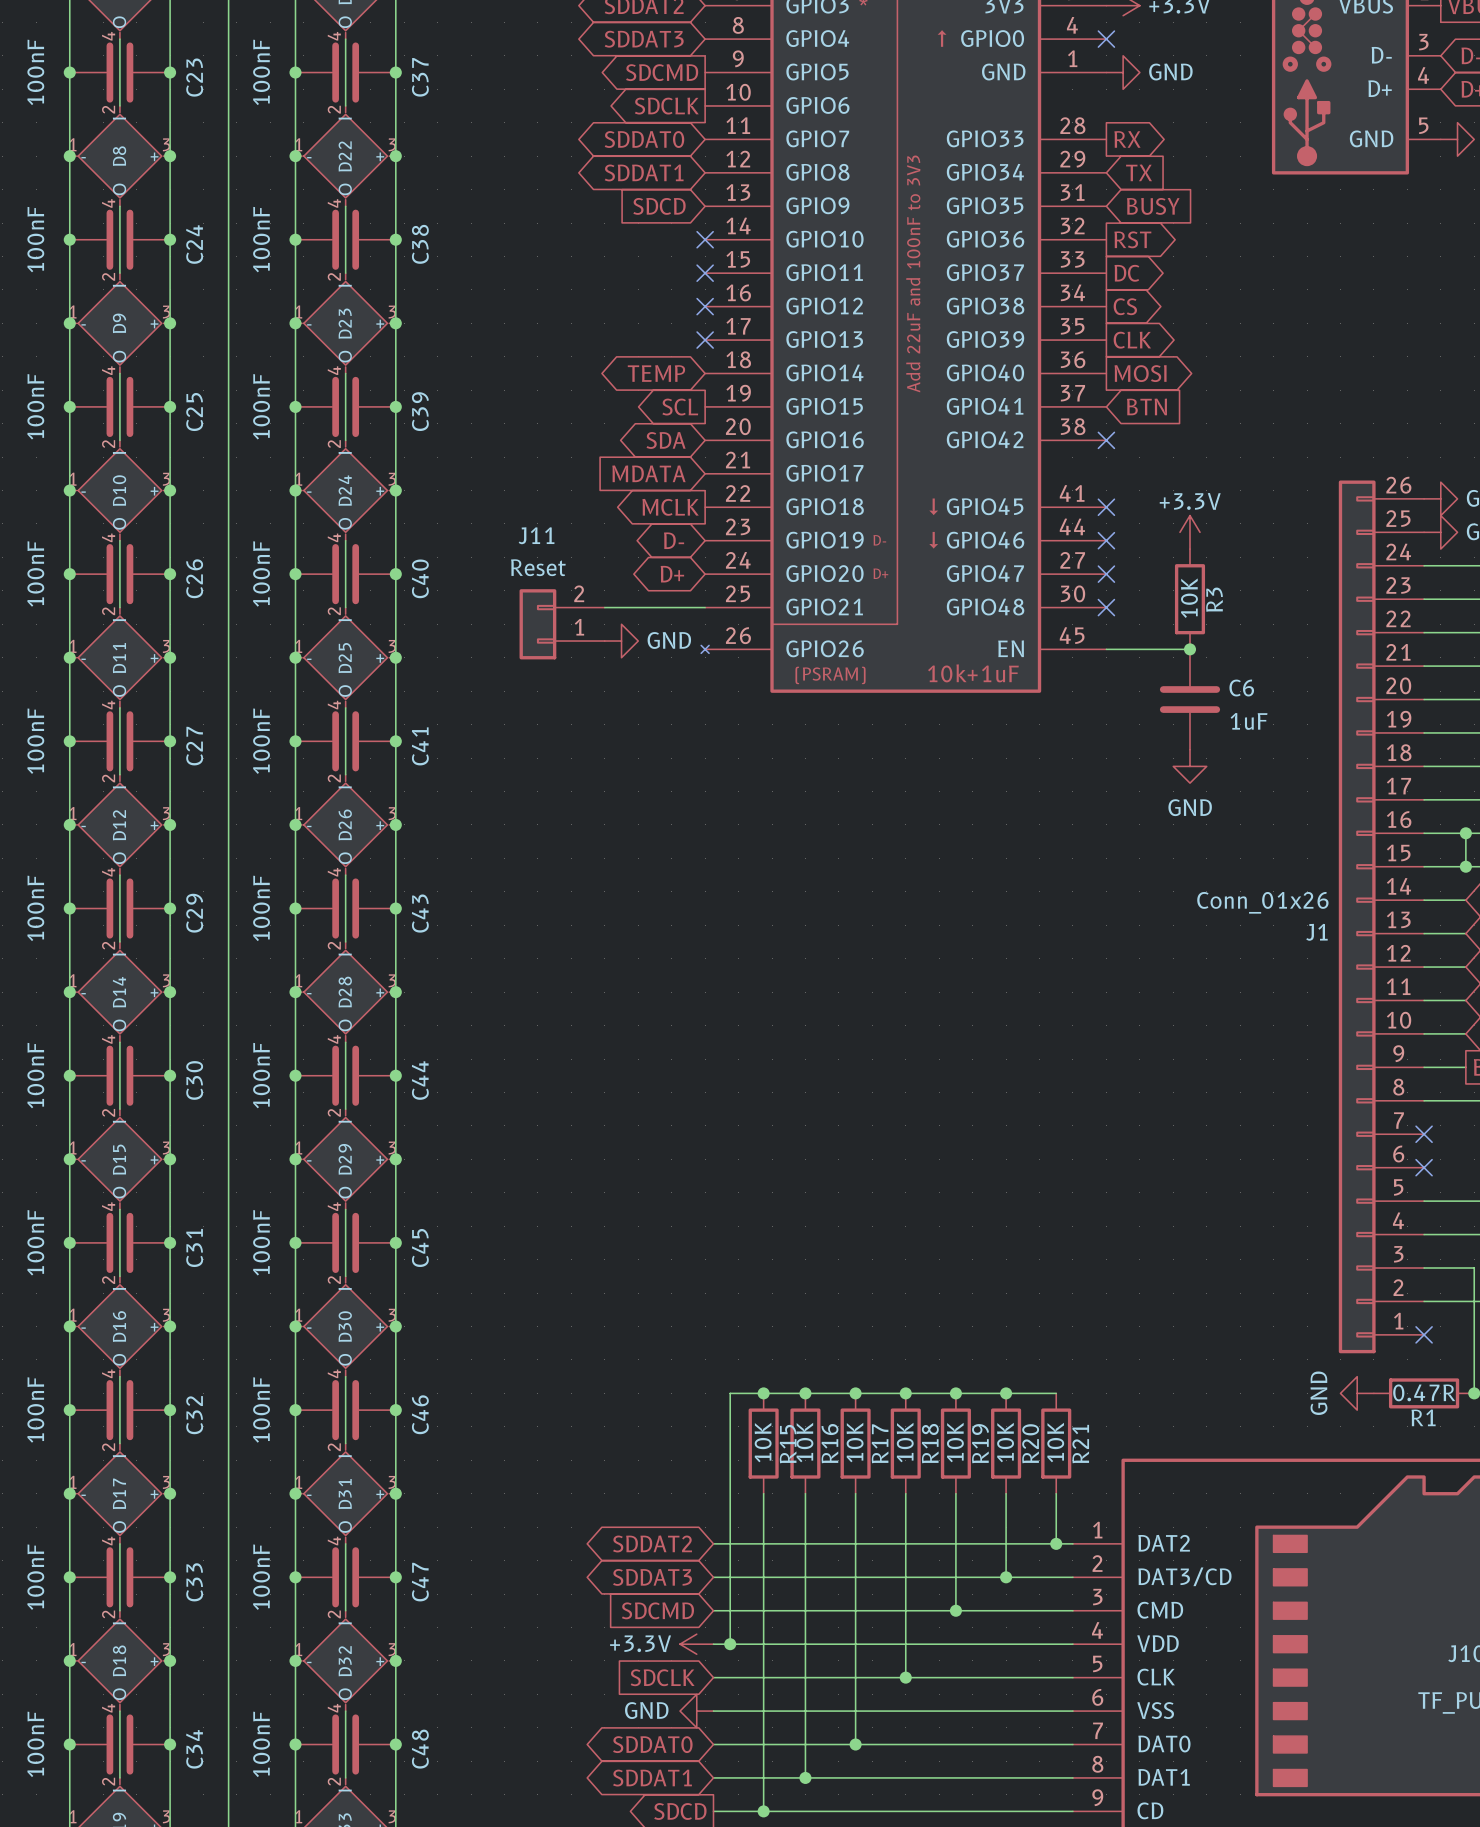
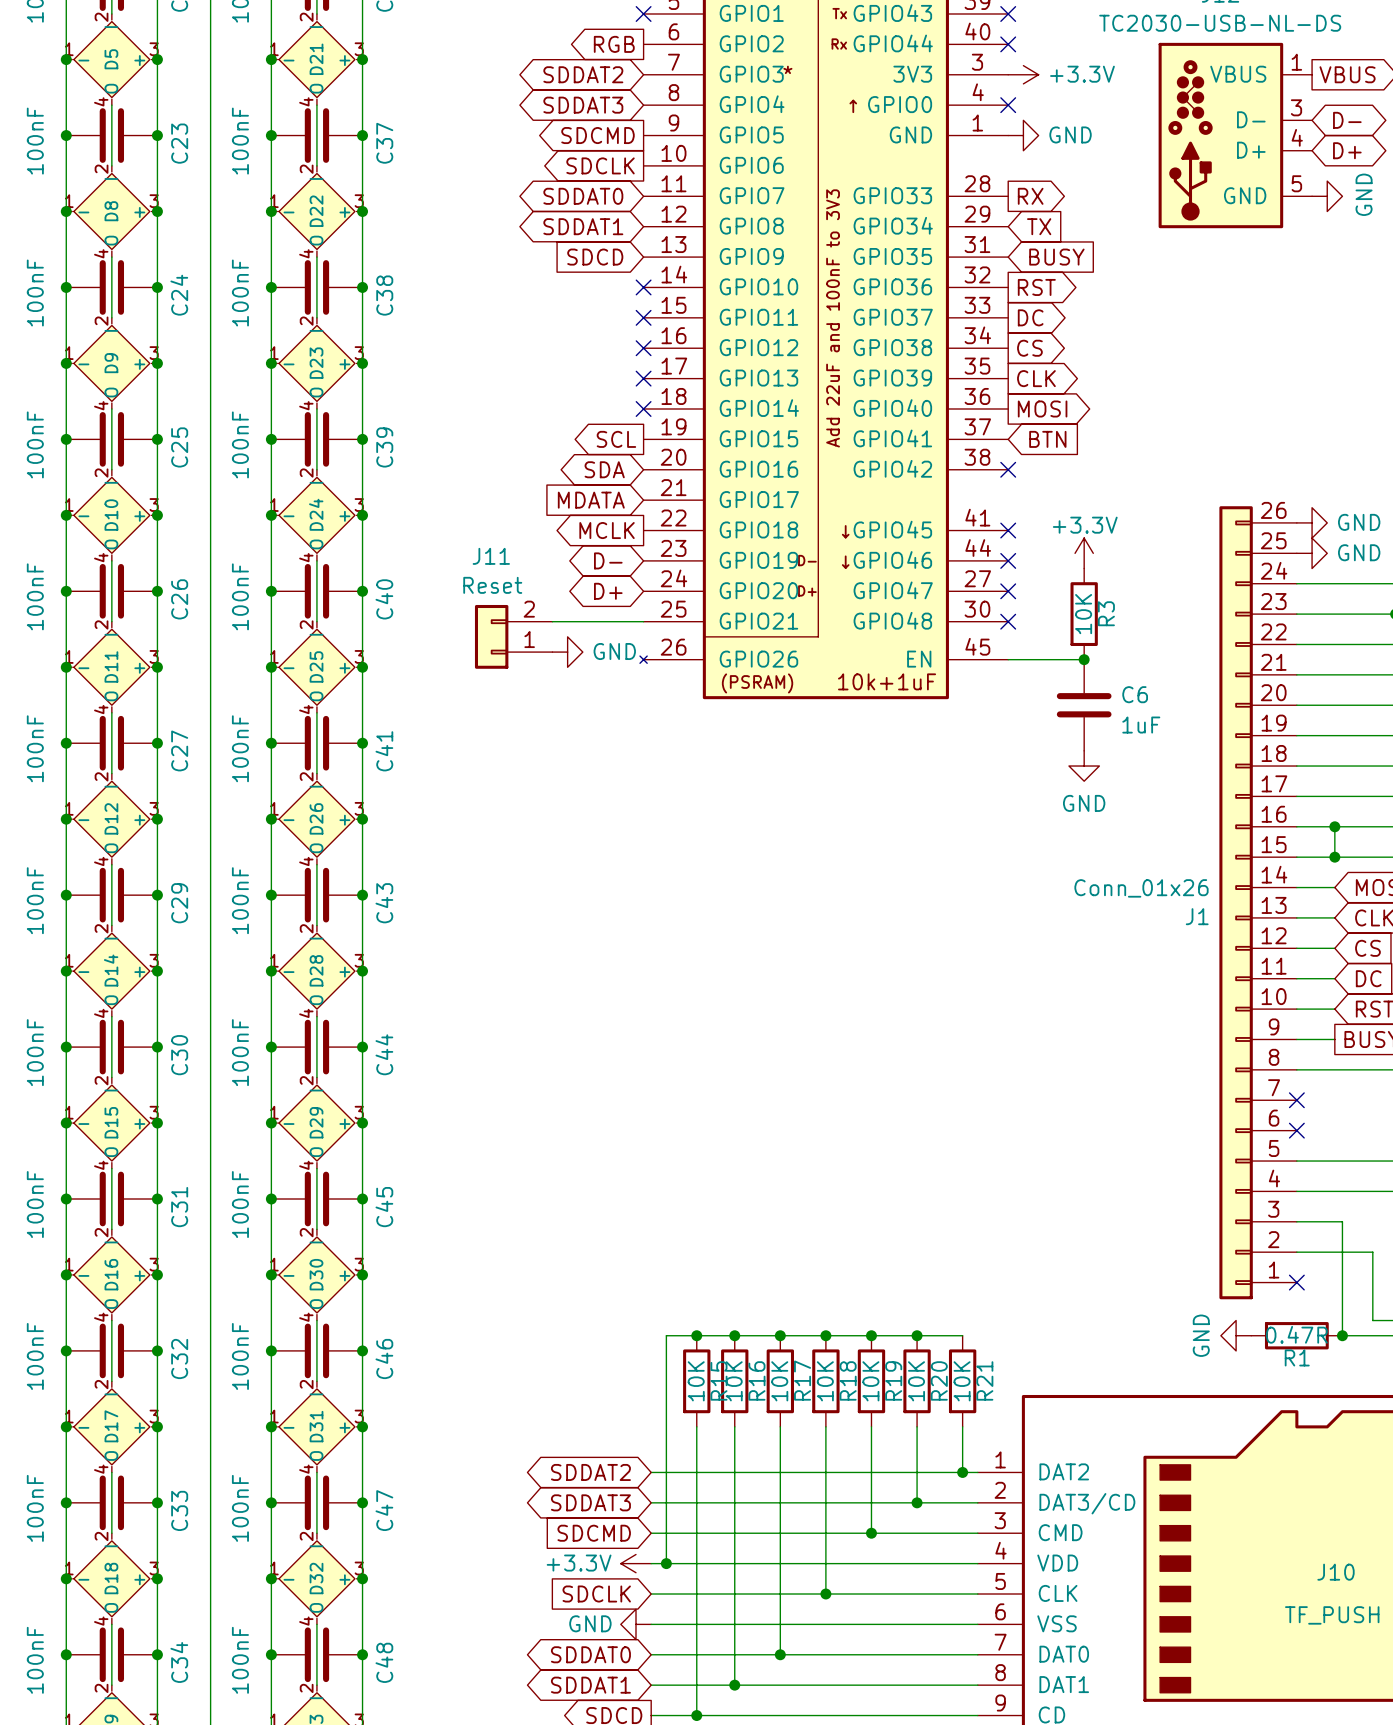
global label: TEMP (656, 373) -> none
no-connect mark: none -> (643, 408)

